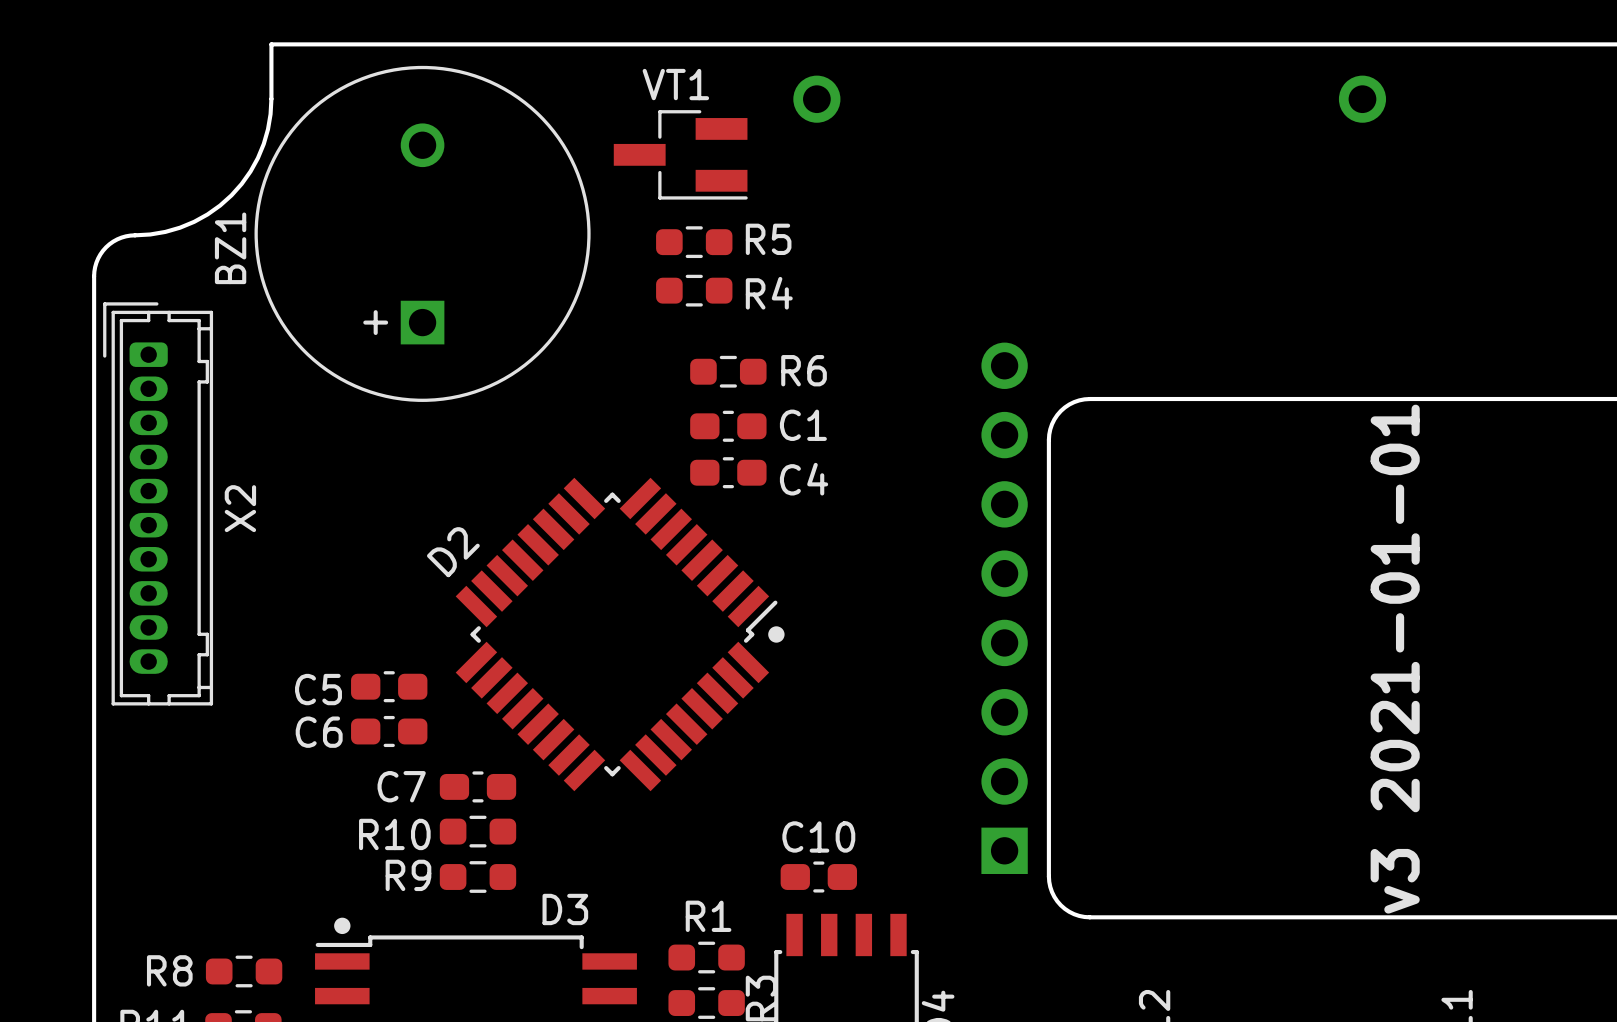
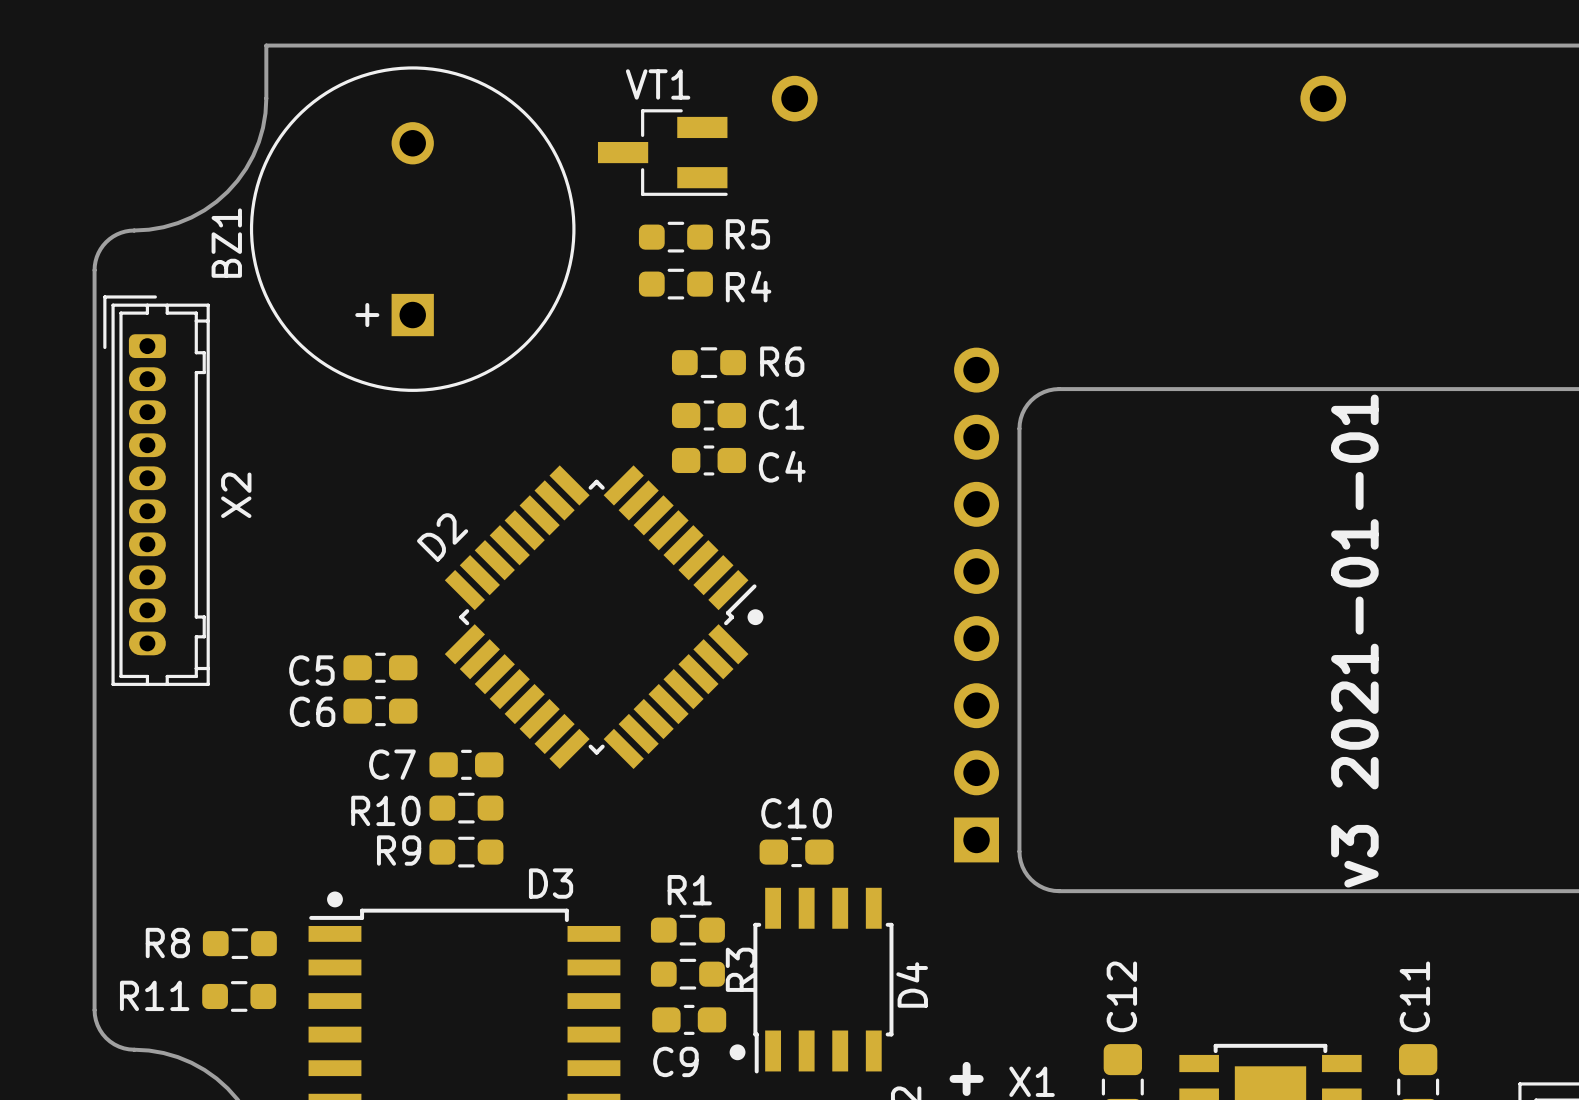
part position: (1004, 608) -> (976, 605)

